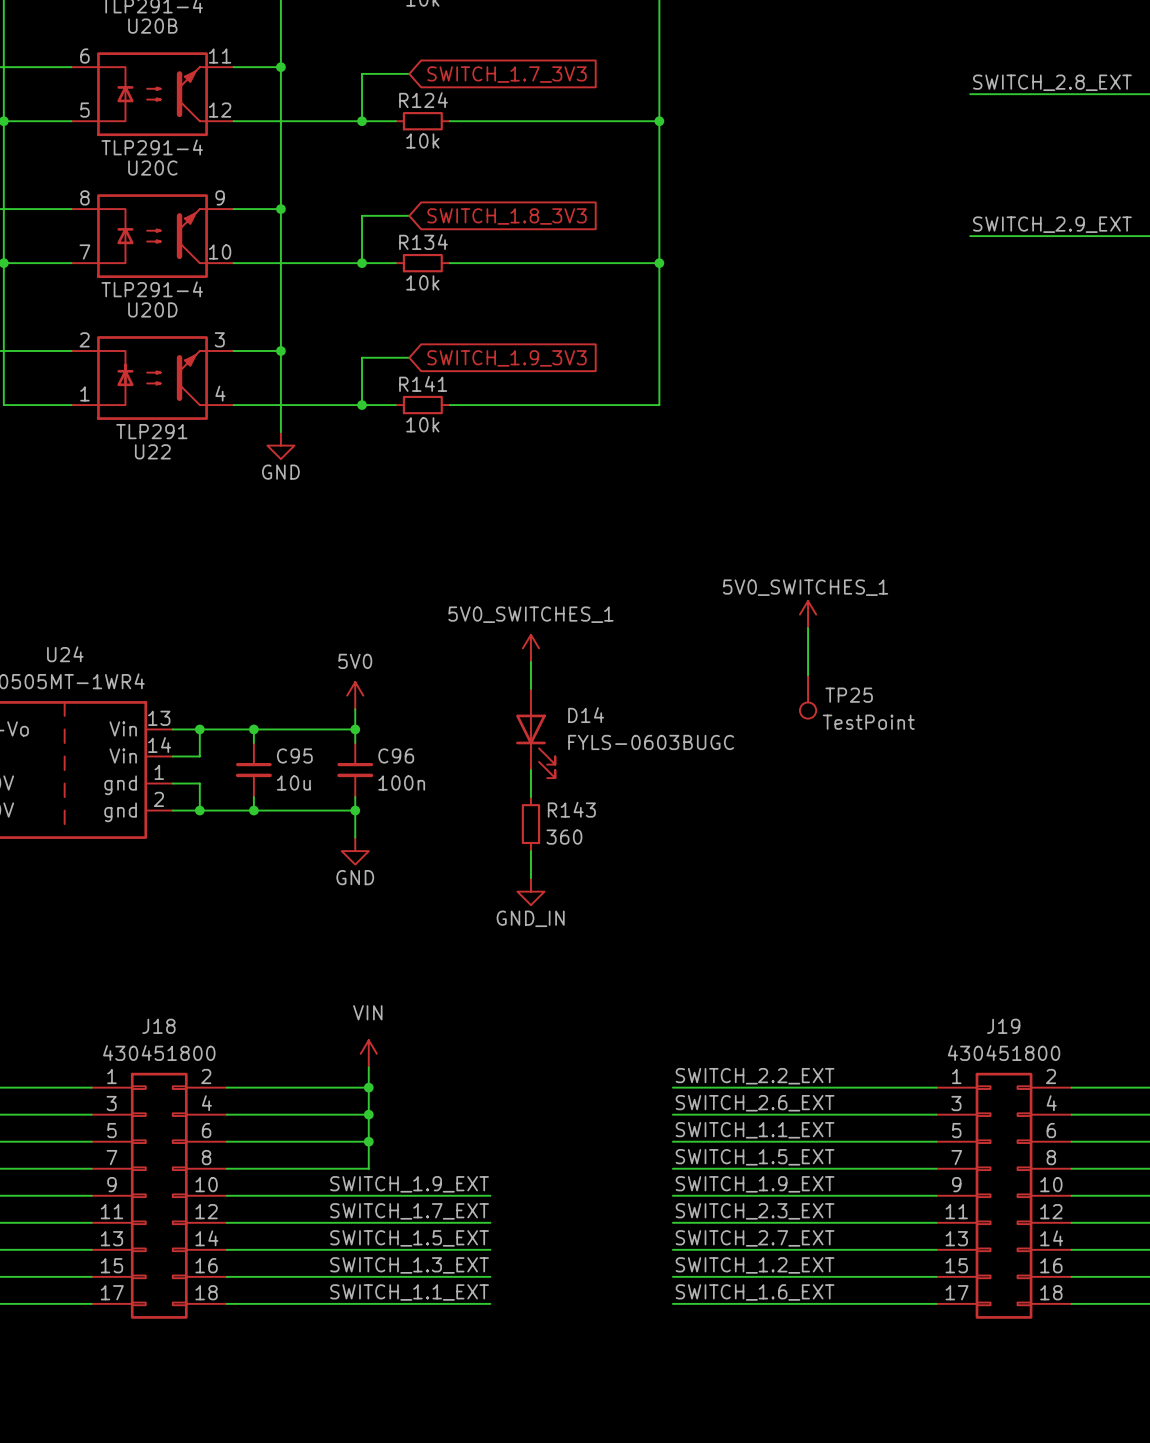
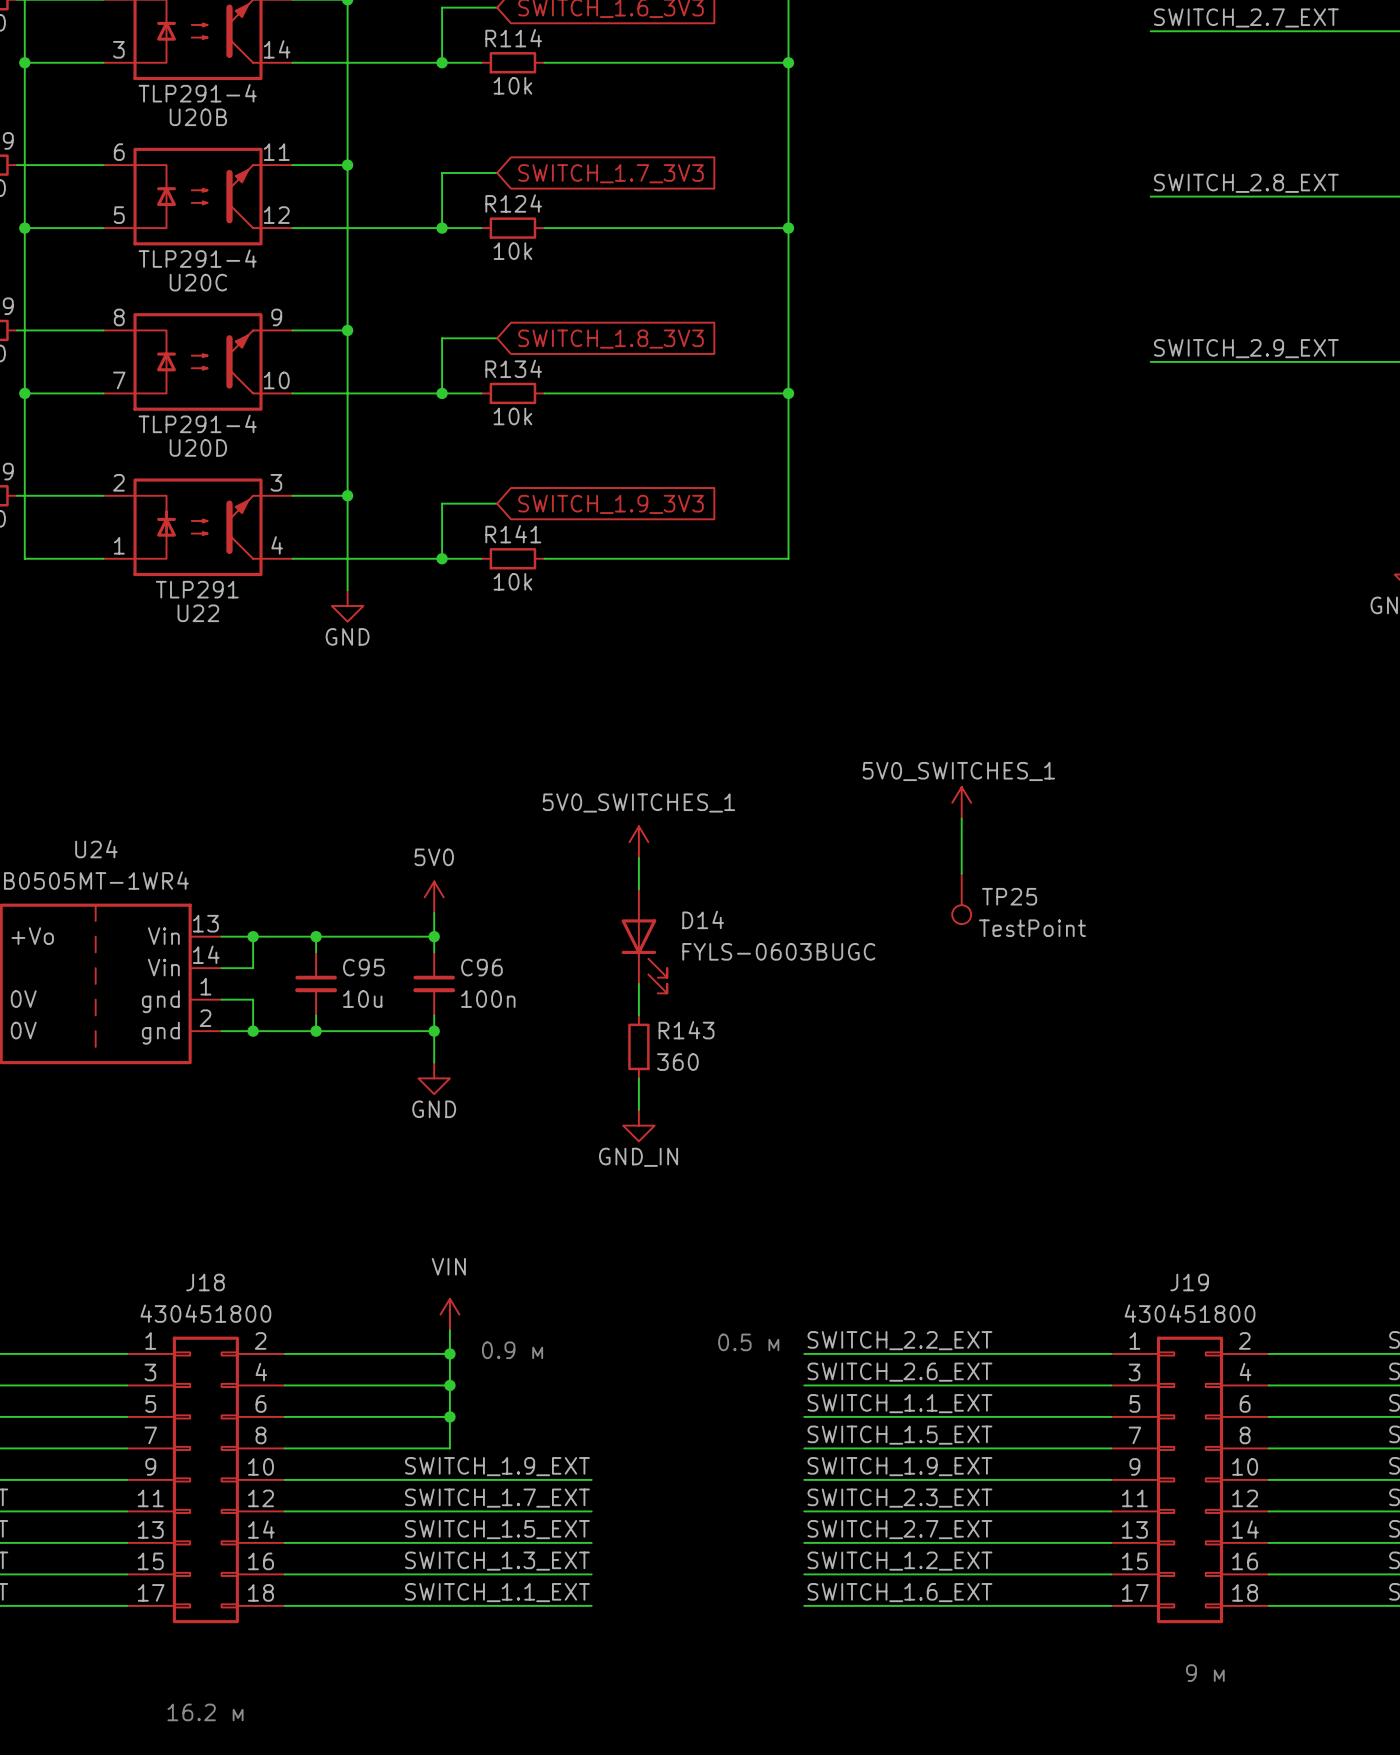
text: none -> 0.5 м (748, 1342)
text: none -> 0.9 м (512, 1350)
text: none -> 9 м (1205, 1673)
text: none -> 16.2 м (205, 1712)

